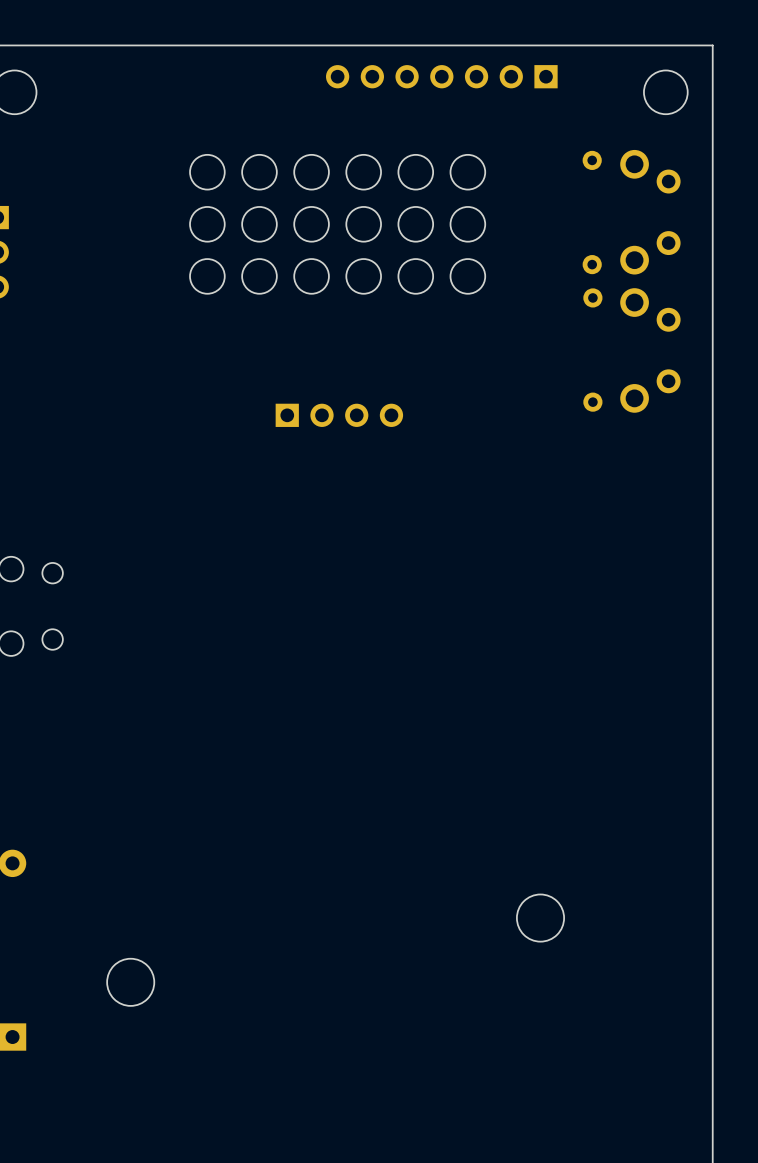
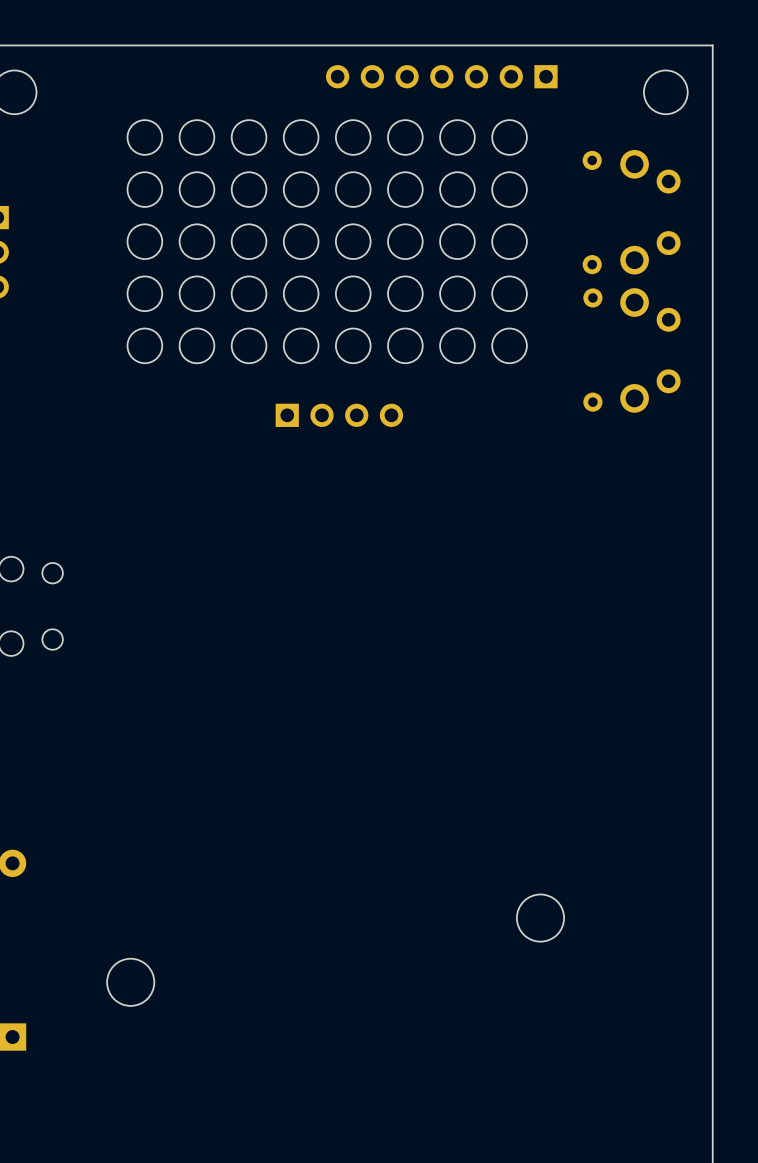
round board edge: none -> [126, 119, 163, 156]
round board edge: none -> [178, 119, 216, 156]
round board edge: none -> [231, 119, 268, 156]
round board edge: none -> [283, 119, 320, 156]
round board edge: none -> [335, 119, 372, 156]
round board edge: none -> [387, 119, 424, 156]
round board edge: none -> [439, 119, 476, 156]
round board edge: none -> [491, 119, 528, 156]
round board edge: [189, 154, 226, 191] -> none
round board edge: [241, 154, 278, 191] -> none
round board edge: [293, 154, 330, 191] -> none
round board edge: [345, 154, 382, 191] -> none
round board edge: [397, 154, 434, 191] -> none
round board edge: [449, 154, 486, 191] -> none
round board edge: none -> [126, 171, 163, 208]
round board edge: none -> [178, 171, 216, 208]
round board edge: none -> [231, 171, 268, 208]
round board edge: none -> [283, 171, 320, 208]
round board edge: none -> [335, 171, 372, 208]
round board edge: none -> [387, 171, 424, 208]
round board edge: none -> [439, 171, 476, 208]
round board edge: none -> [491, 171, 528, 208]
round board edge: [189, 206, 226, 243] -> none
round board edge: [241, 206, 278, 243] -> none
round board edge: [293, 206, 330, 243] -> none
round board edge: [345, 206, 382, 243] -> none
round board edge: [397, 206, 434, 243] -> none
round board edge: [449, 206, 486, 243] -> none
round board edge: none -> [126, 223, 163, 260]
round board edge: none -> [178, 223, 216, 260]
round board edge: none -> [231, 223, 268, 260]
round board edge: none -> [283, 223, 320, 260]
round board edge: none -> [335, 223, 372, 260]
round board edge: none -> [387, 223, 424, 260]
round board edge: none -> [439, 223, 476, 260]
round board edge: none -> [491, 223, 528, 260]
round board edge: [189, 258, 226, 295] -> none
round board edge: [241, 258, 278, 295] -> none
round board edge: [293, 258, 330, 295] -> none
round board edge: [345, 258, 382, 295] -> none
round board edge: [397, 258, 434, 295] -> none
round board edge: [449, 258, 486, 295] -> none
round board edge: none -> [126, 275, 163, 312]
round board edge: none -> [178, 275, 216, 312]
round board edge: none -> [231, 275, 268, 312]
round board edge: none -> [283, 275, 320, 312]
round board edge: none -> [335, 275, 372, 312]
round board edge: none -> [387, 275, 424, 312]
round board edge: none -> [439, 275, 476, 312]
round board edge: none -> [491, 275, 528, 312]
round board edge: none -> [126, 327, 163, 364]
round board edge: none -> [178, 327, 216, 364]
round board edge: none -> [231, 327, 268, 364]
round board edge: none -> [283, 327, 320, 364]
round board edge: none -> [335, 327, 372, 364]
round board edge: none -> [387, 327, 424, 364]
round board edge: none -> [439, 327, 476, 364]
round board edge: none -> [491, 327, 528, 364]

